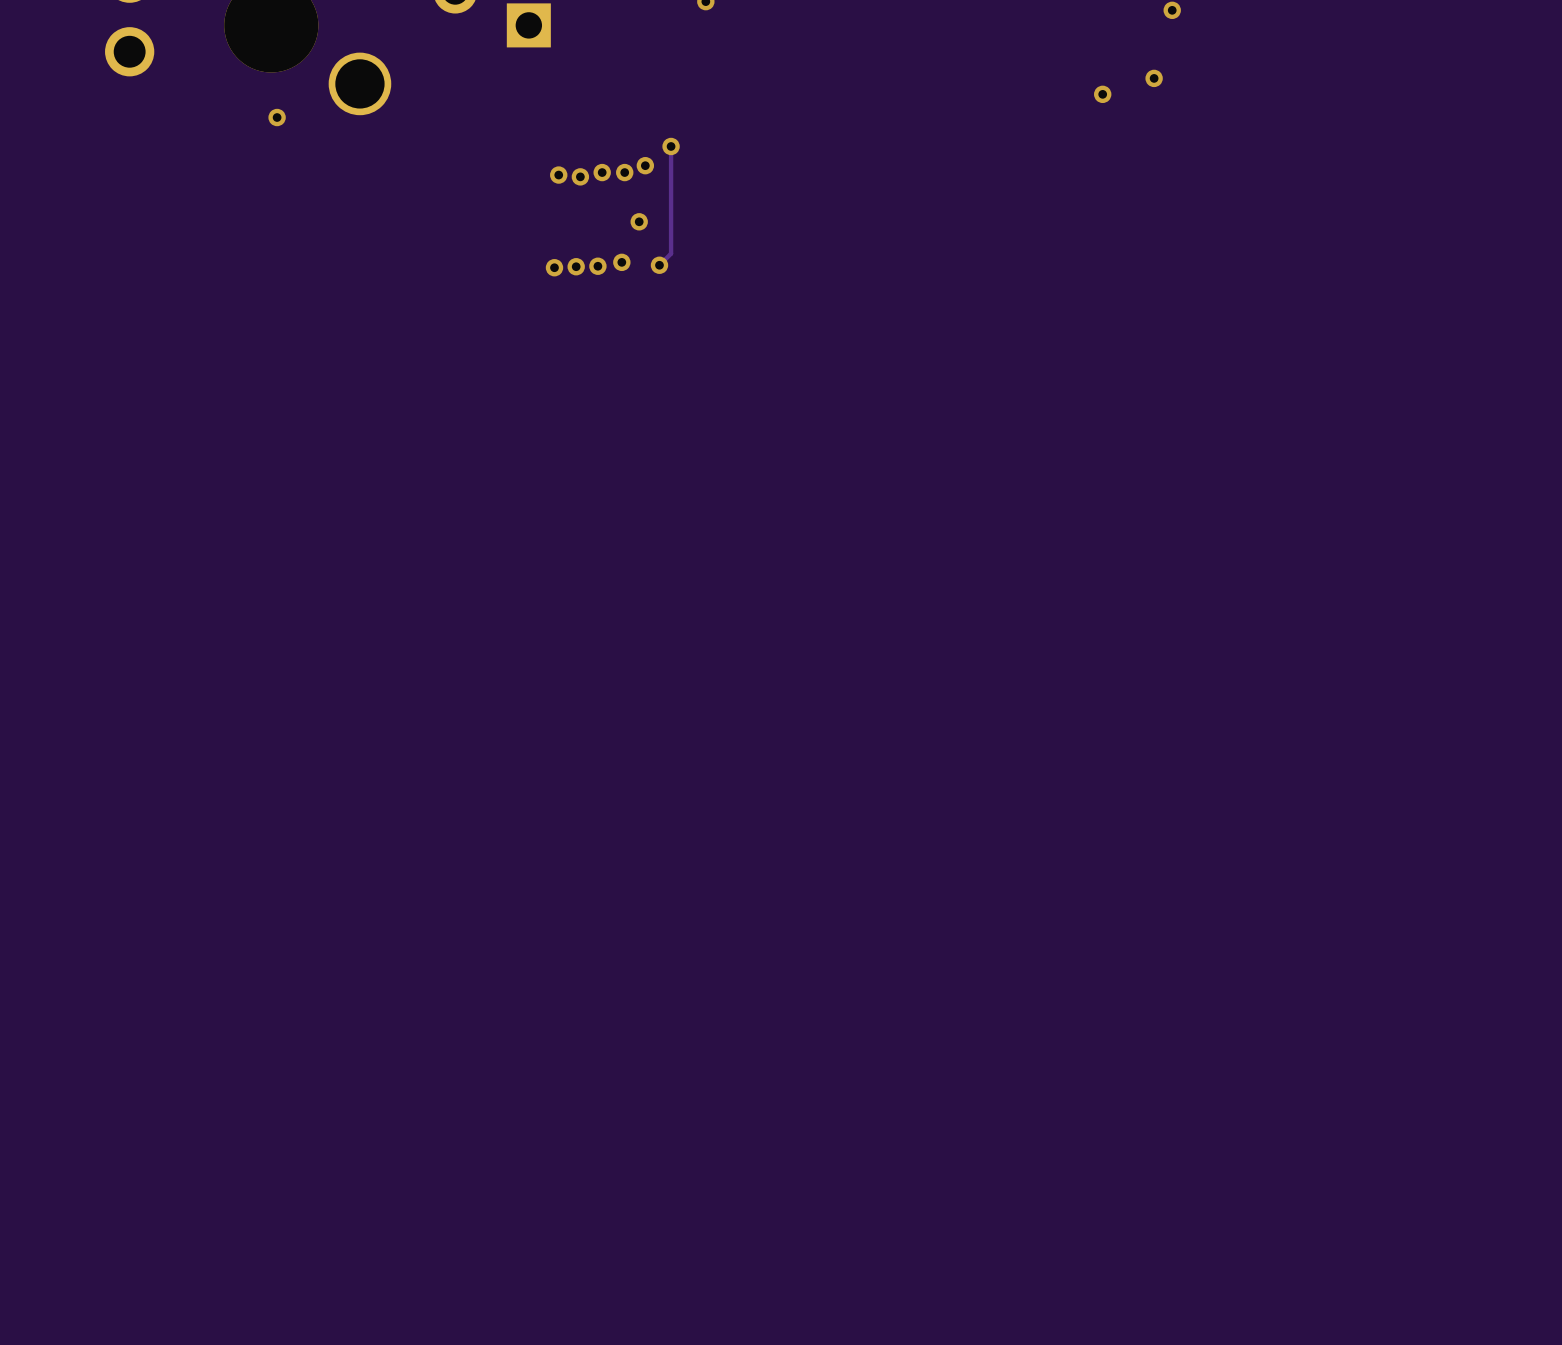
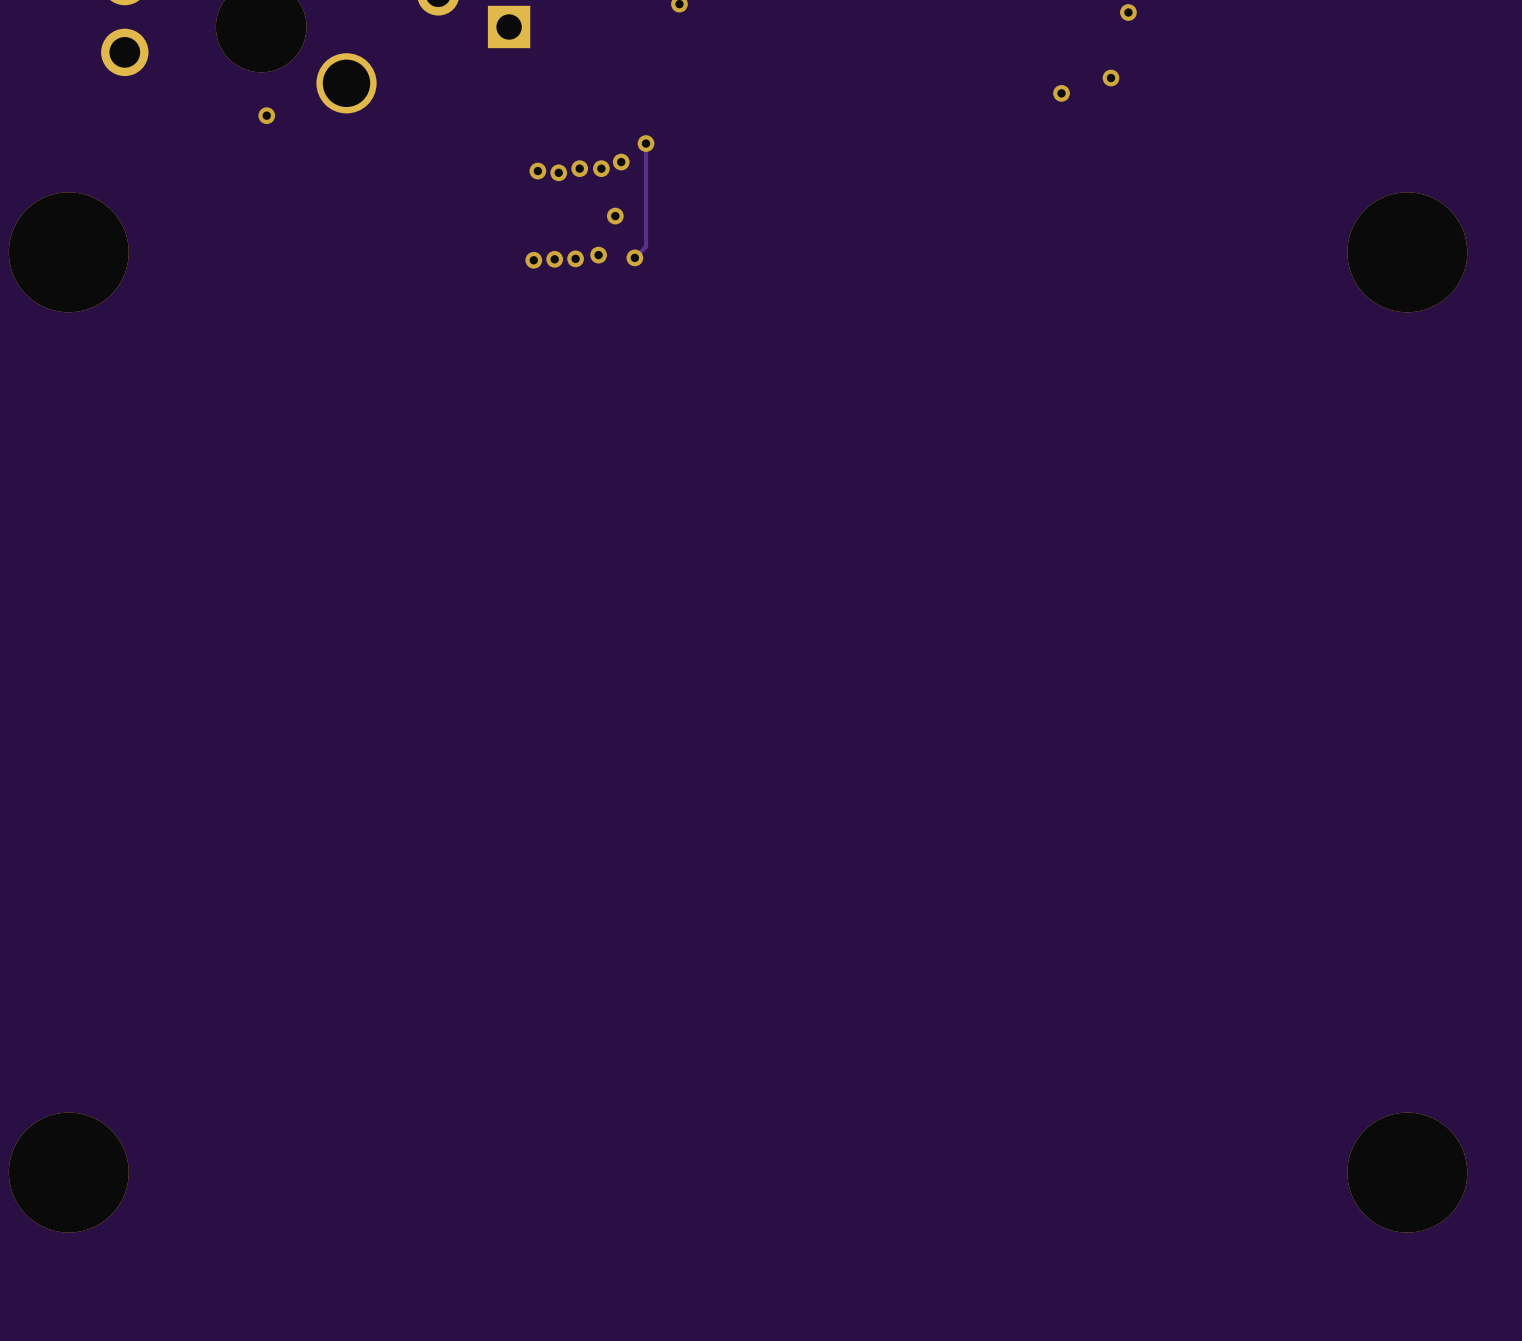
part: none -> (68, 252)
part: none -> (1407, 252)
part: none -> (68, 1172)
part: none -> (1407, 1172)

